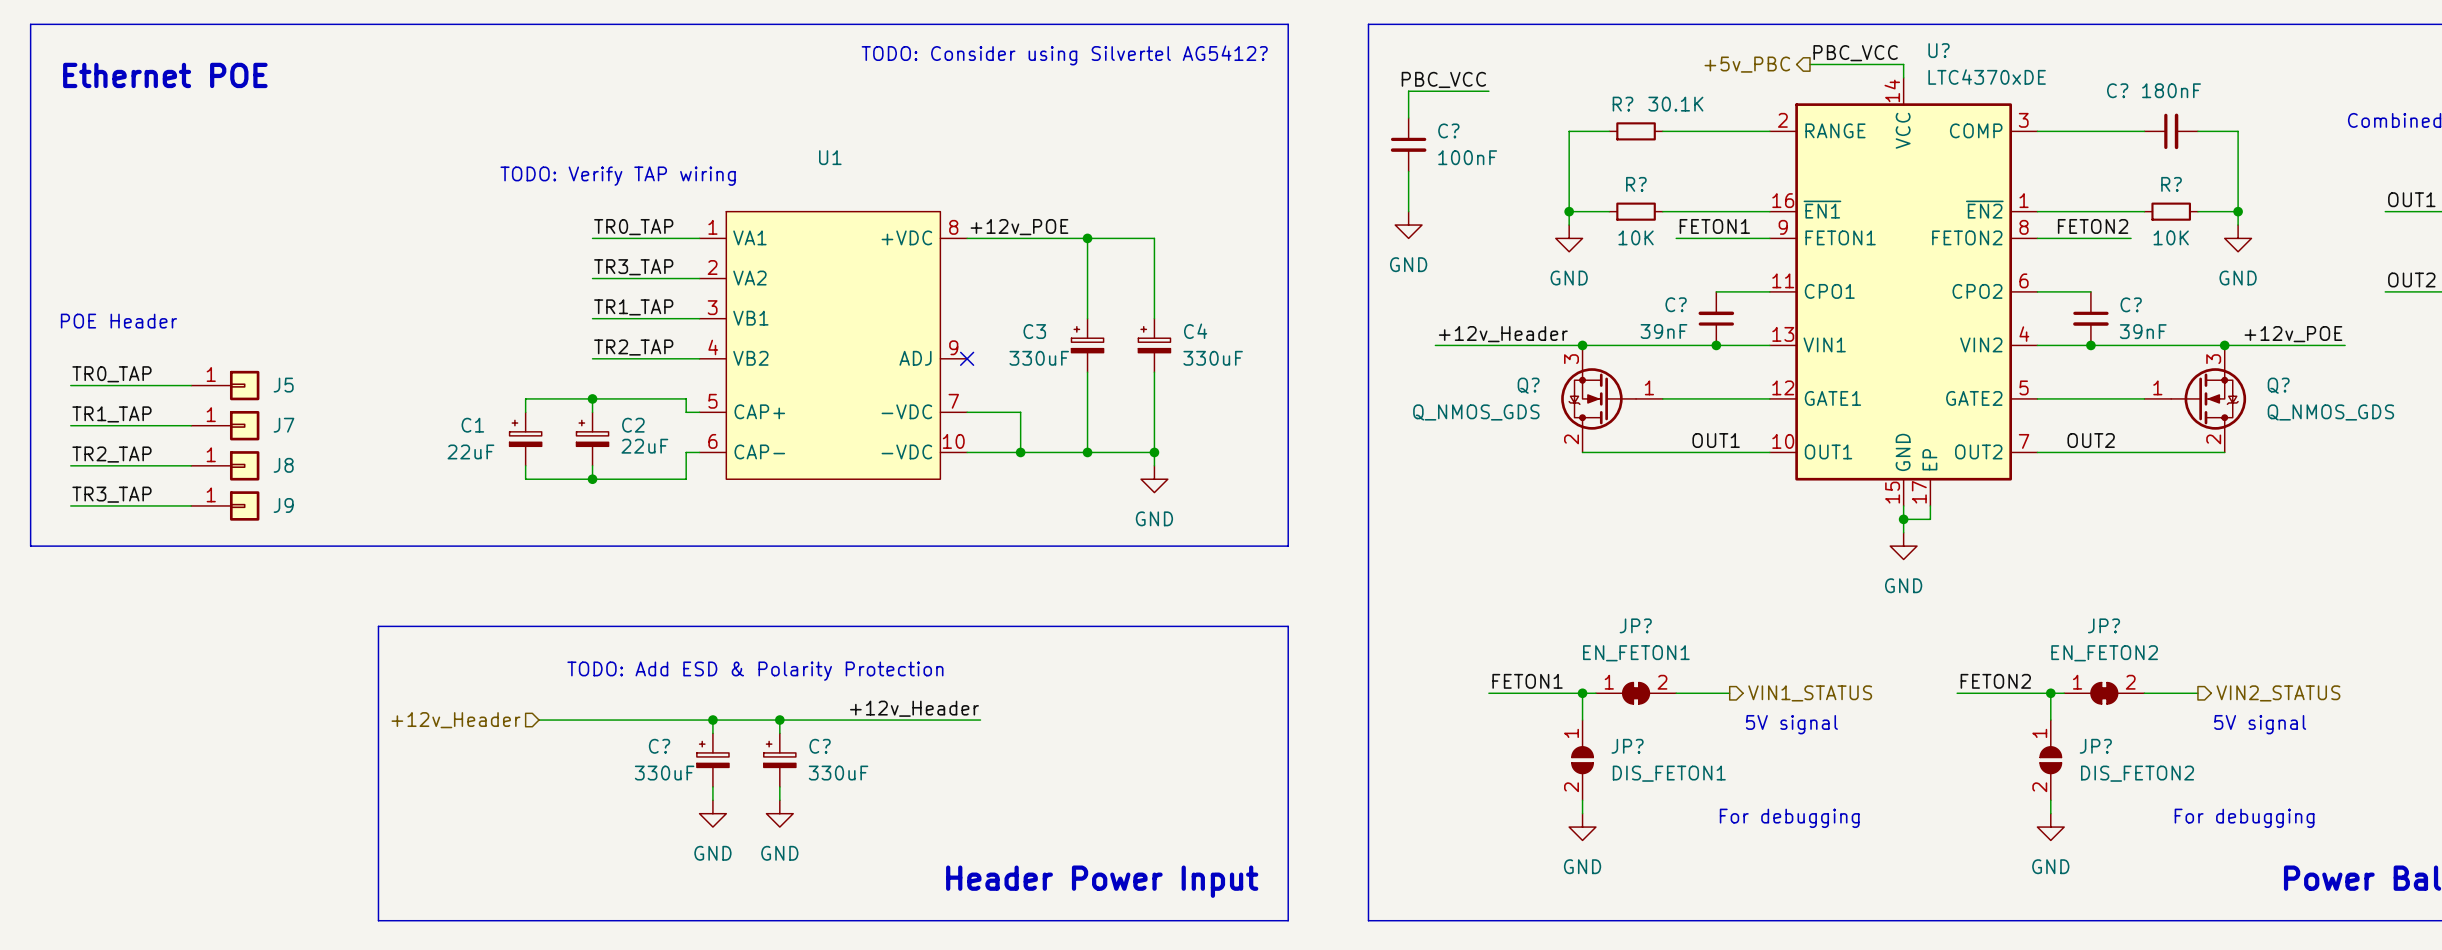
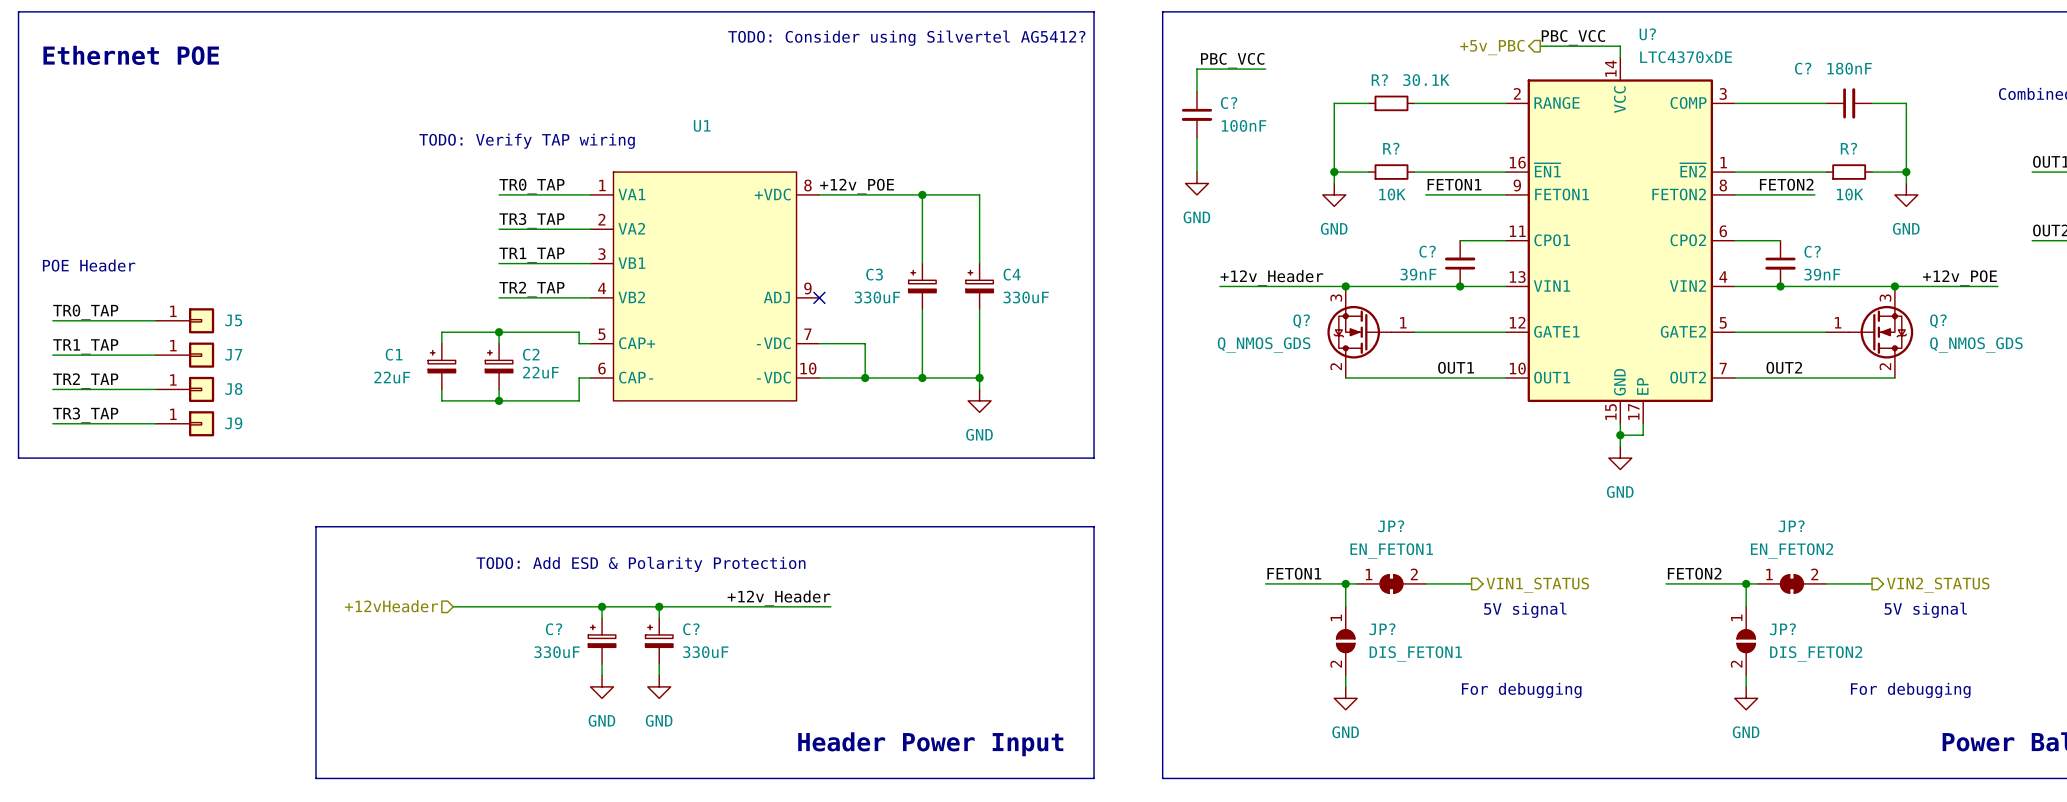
hierarchical label: +12v_Header (455, 720) -> +12vHeader (391, 606)

